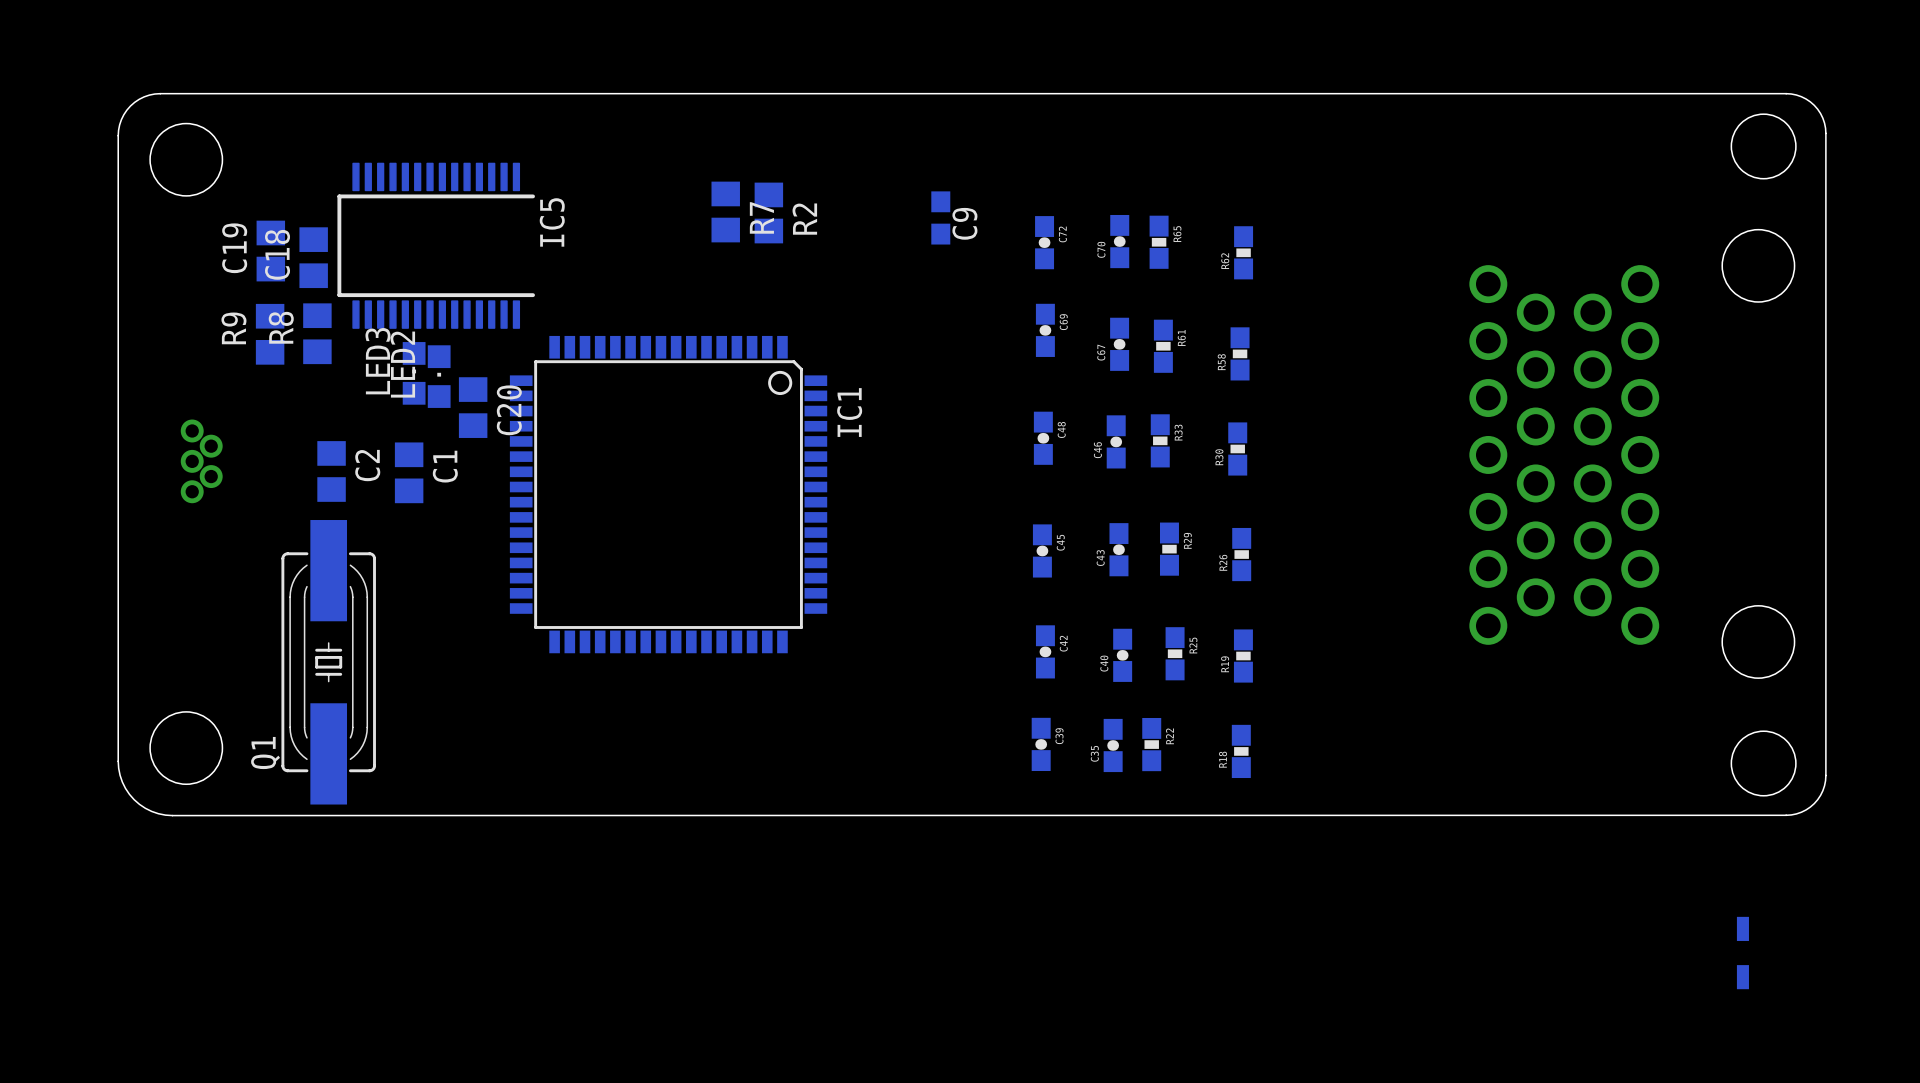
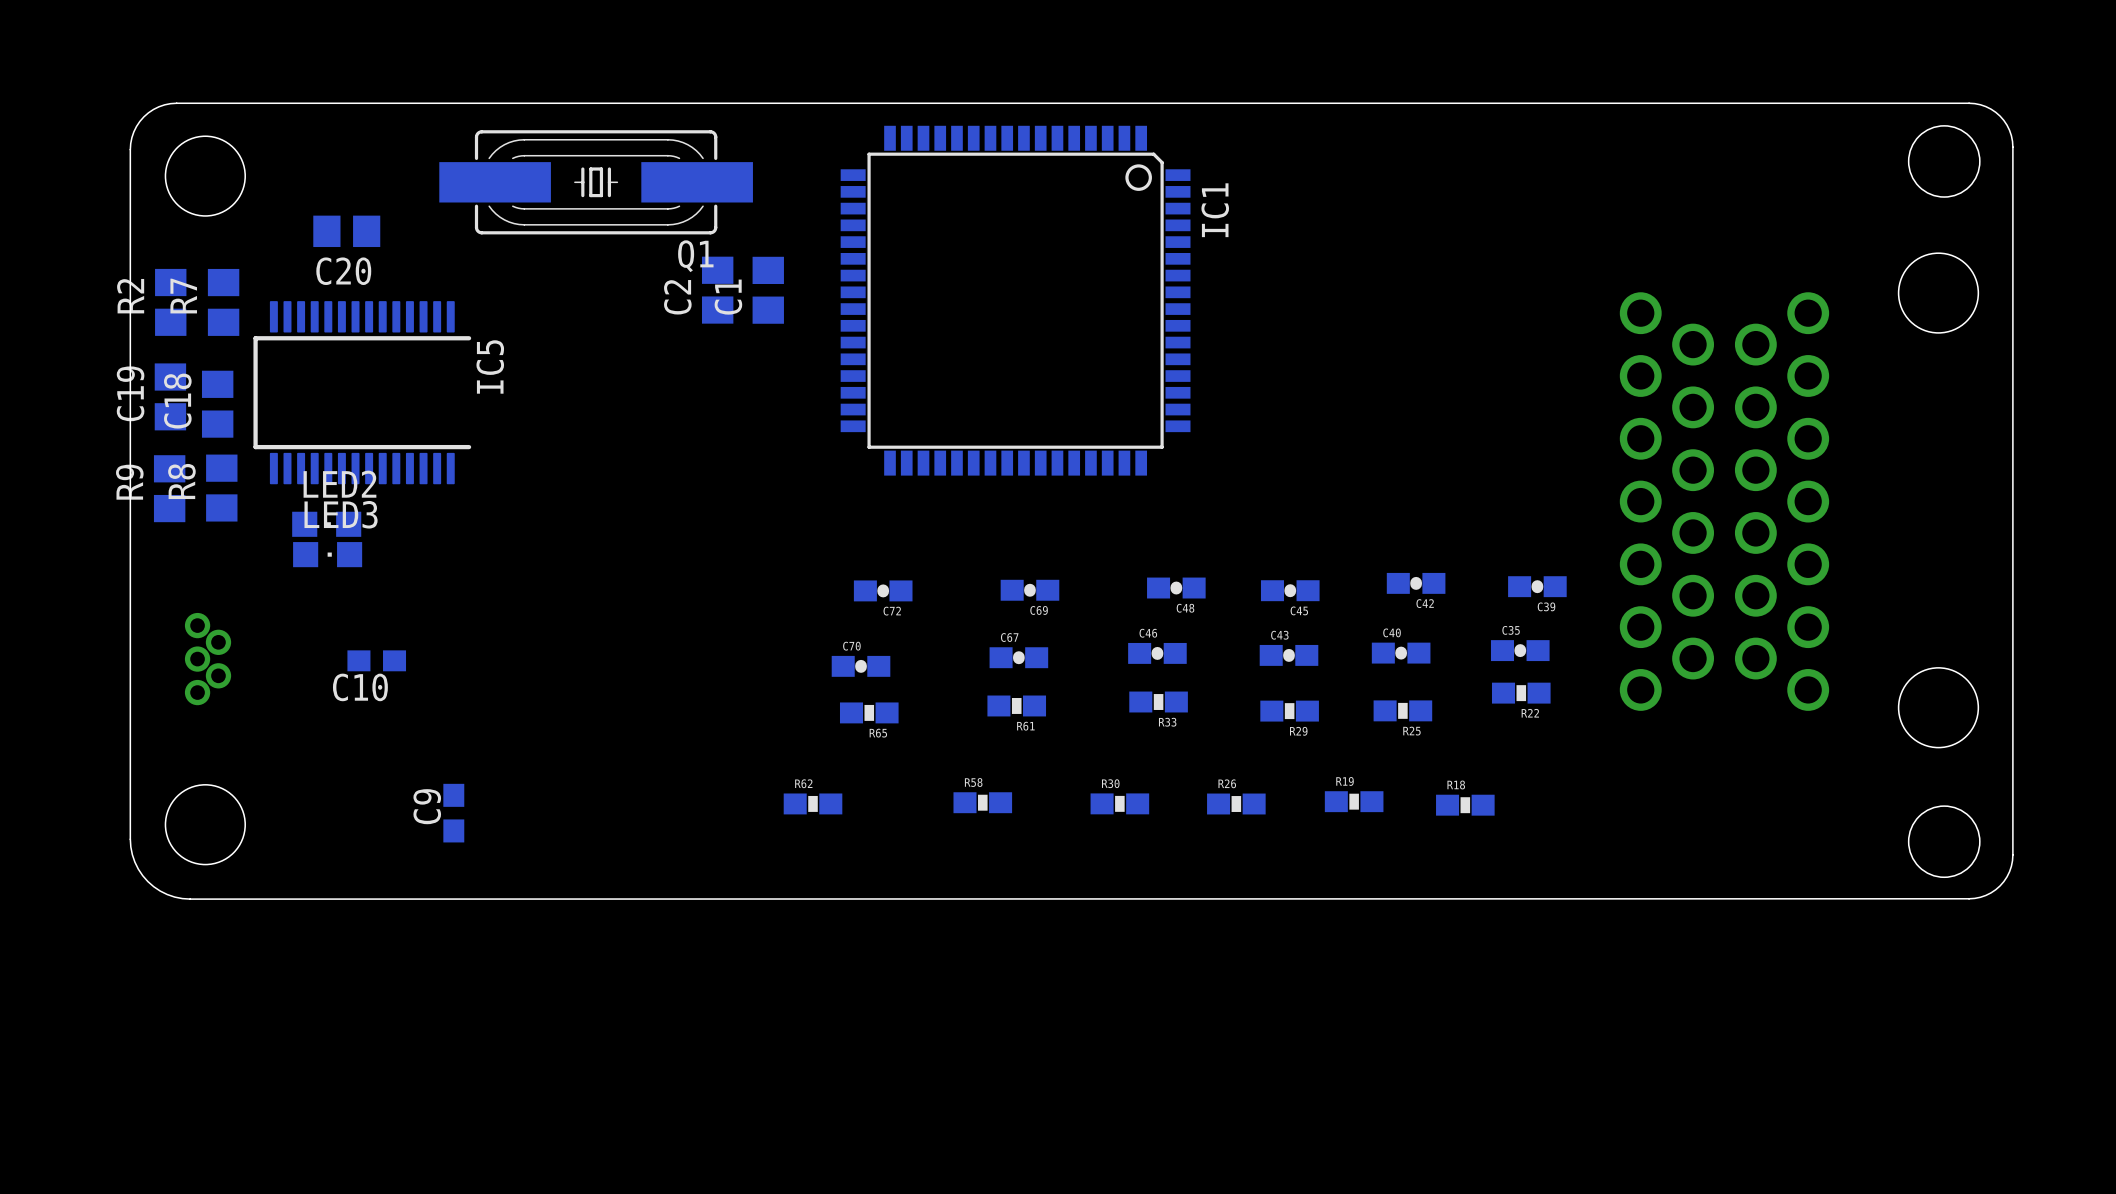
R7 position: (725, 211) -> (223, 302)
R2 position: (768, 212) -> (170, 302)
R7 name position: R7 (761, 217) -> R7 (183, 296)
C9 position: (940, 217) -> (453, 813)
R2 name position: R2 (804, 219) -> R2 (130, 296)
C9 name position: C9 (964, 223) -> C9 (427, 806)
C70 rotation: 0° (1119, 241) -> 90° clockwise (861, 666)
C70 position: (1119, 241) -> (861, 666)
C72 rotation: 0° (1044, 242) -> 90° clockwise (883, 590)
C72 position: (1044, 242) -> (883, 590)
R65 rotation: 0° (1159, 242) -> 90° clockwise (869, 712)
R65 position: (1159, 242) -> (869, 712)
IC5 position: (436, 245) -> (362, 392)
C19 position: (270, 251) -> (170, 396)
R62 rotation: 0° (1243, 252) -> 90° clockwise (813, 803)
R62 position: (1243, 252) -> (813, 803)
C18 position: (313, 257) -> (217, 404)
C69 rotation: 0° (1045, 330) -> 90° clockwise (1029, 590)
C69 position: (1045, 330) -> (1029, 590)
R8 position: (317, 333) -> (221, 488)
R9 position: (270, 334) -> (169, 488)
C67 rotation: 0° (1119, 344) -> 90° clockwise (1018, 657)
C67 position: (1119, 344) -> (1018, 657)
R61 rotation: 0° (1163, 346) -> 90° clockwise (1016, 705)
R61 position: (1163, 346) -> (1016, 705)
R58 rotation: 0° (1240, 353) -> 90° clockwise (982, 802)
R58 position: (1240, 353) -> (982, 802)
LED3 rotation: 0° (414, 373) -> 90° clockwise (327, 554)
LED3 position: (414, 373) -> (327, 554)
LED2 rotation: 0° (439, 376) -> 90° clockwise (326, 524)
LED2 position: (439, 376) -> (326, 524)
C20 rotation: 0° (473, 407) -> 90° clockwise (346, 231)
C20 position: (473, 407) -> (346, 231)
C48 rotation: 0° (1043, 438) -> 90° clockwise (1176, 588)
C48 position: (1043, 438) -> (1176, 588)
R33 rotation: 0° (1160, 440) -> 90° clockwise (1158, 702)
R33 position: (1160, 440) -> (1158, 702)
C46 rotation: 0° (1116, 441) -> 90° clockwise (1157, 653)
C46 position: (1116, 441) -> (1157, 653)
R30 rotation: 0° (1237, 448) -> 90° clockwise (1119, 803)
R30 position: (1237, 448) -> (1119, 803)
part position: (201, 461) -> (208, 659)
C2 name position: C2 (367, 465) -> C2 (677, 297)
C1 name position: C1 (445, 466) -> C1 (728, 297)
C2 position: (331, 471) -> (717, 290)
C1 position: (409, 472) -> (768, 290)
IC1 position: (668, 494) -> (1015, 300)
C43 rotation: 0° (1118, 549) -> 90° clockwise (1289, 655)
C43 position: (1118, 549) -> (1289, 655)
R29 rotation: 0° (1169, 549) -> 90° clockwise (1289, 711)
R29 position: (1169, 549) -> (1289, 711)
C45 rotation: 0° (1042, 550) -> 90° clockwise (1290, 590)
C45 position: (1042, 550) -> (1290, 590)
R26 rotation: 0° (1241, 554) -> 90° clockwise (1236, 804)
R26 position: (1241, 554) -> (1236, 804)
C10: none -> (376, 660)
C42 rotation: 0° (1045, 651) -> 90° clockwise (1416, 583)
C42 position: (1045, 651) -> (1416, 583)
R25 rotation: 0° (1175, 653) -> 90° clockwise (1402, 710)
R25 position: (1175, 653) -> (1402, 710)
C40 rotation: 0° (1122, 655) -> 90° clockwise (1401, 653)
C40 position: (1122, 655) -> (1401, 653)
R19 rotation: 0° (1243, 656) -> 90° clockwise (1354, 801)
R19 position: (1243, 656) -> (1354, 801)
Q1 rotation: 0° (328, 662) -> 90° clockwise (596, 182)
Q1 position: (328, 662) -> (596, 182)
C39 rotation: 0° (1041, 744) -> 90° clockwise (1537, 586)
C39 position: (1041, 744) -> (1537, 586)
R22 rotation: 0° (1151, 744) -> 90° clockwise (1521, 693)
R22 position: (1151, 744) -> (1521, 693)
C35 rotation: 0° (1113, 745) -> 90° clockwise (1520, 650)
C35 position: (1113, 745) -> (1520, 650)
R18 rotation: 0° (1241, 751) -> 90° clockwise (1465, 805)
R18 position: (1241, 751) -> (1465, 805)
Q1 name position: Q1 (265, 753) -> Q1 (695, 256)
part: (1742, 953) -> none

